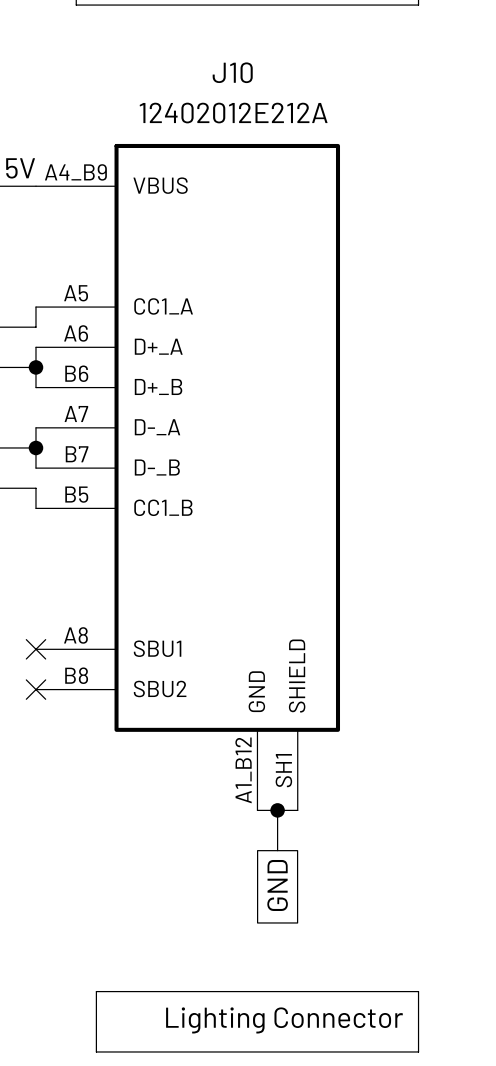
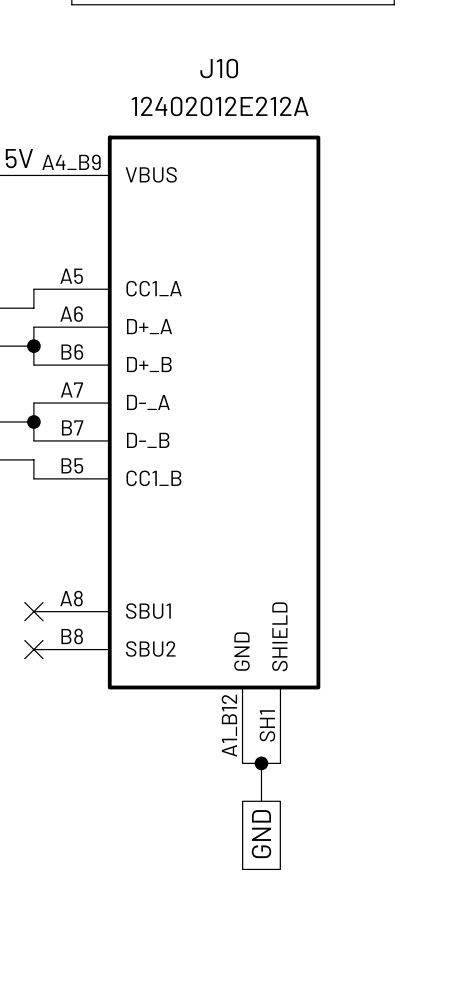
line: (96, 991) (418, 991) (418, 1051) (96, 1051) (96, 991) -> none
text: Lighting Connector (284, 1020) -> none

